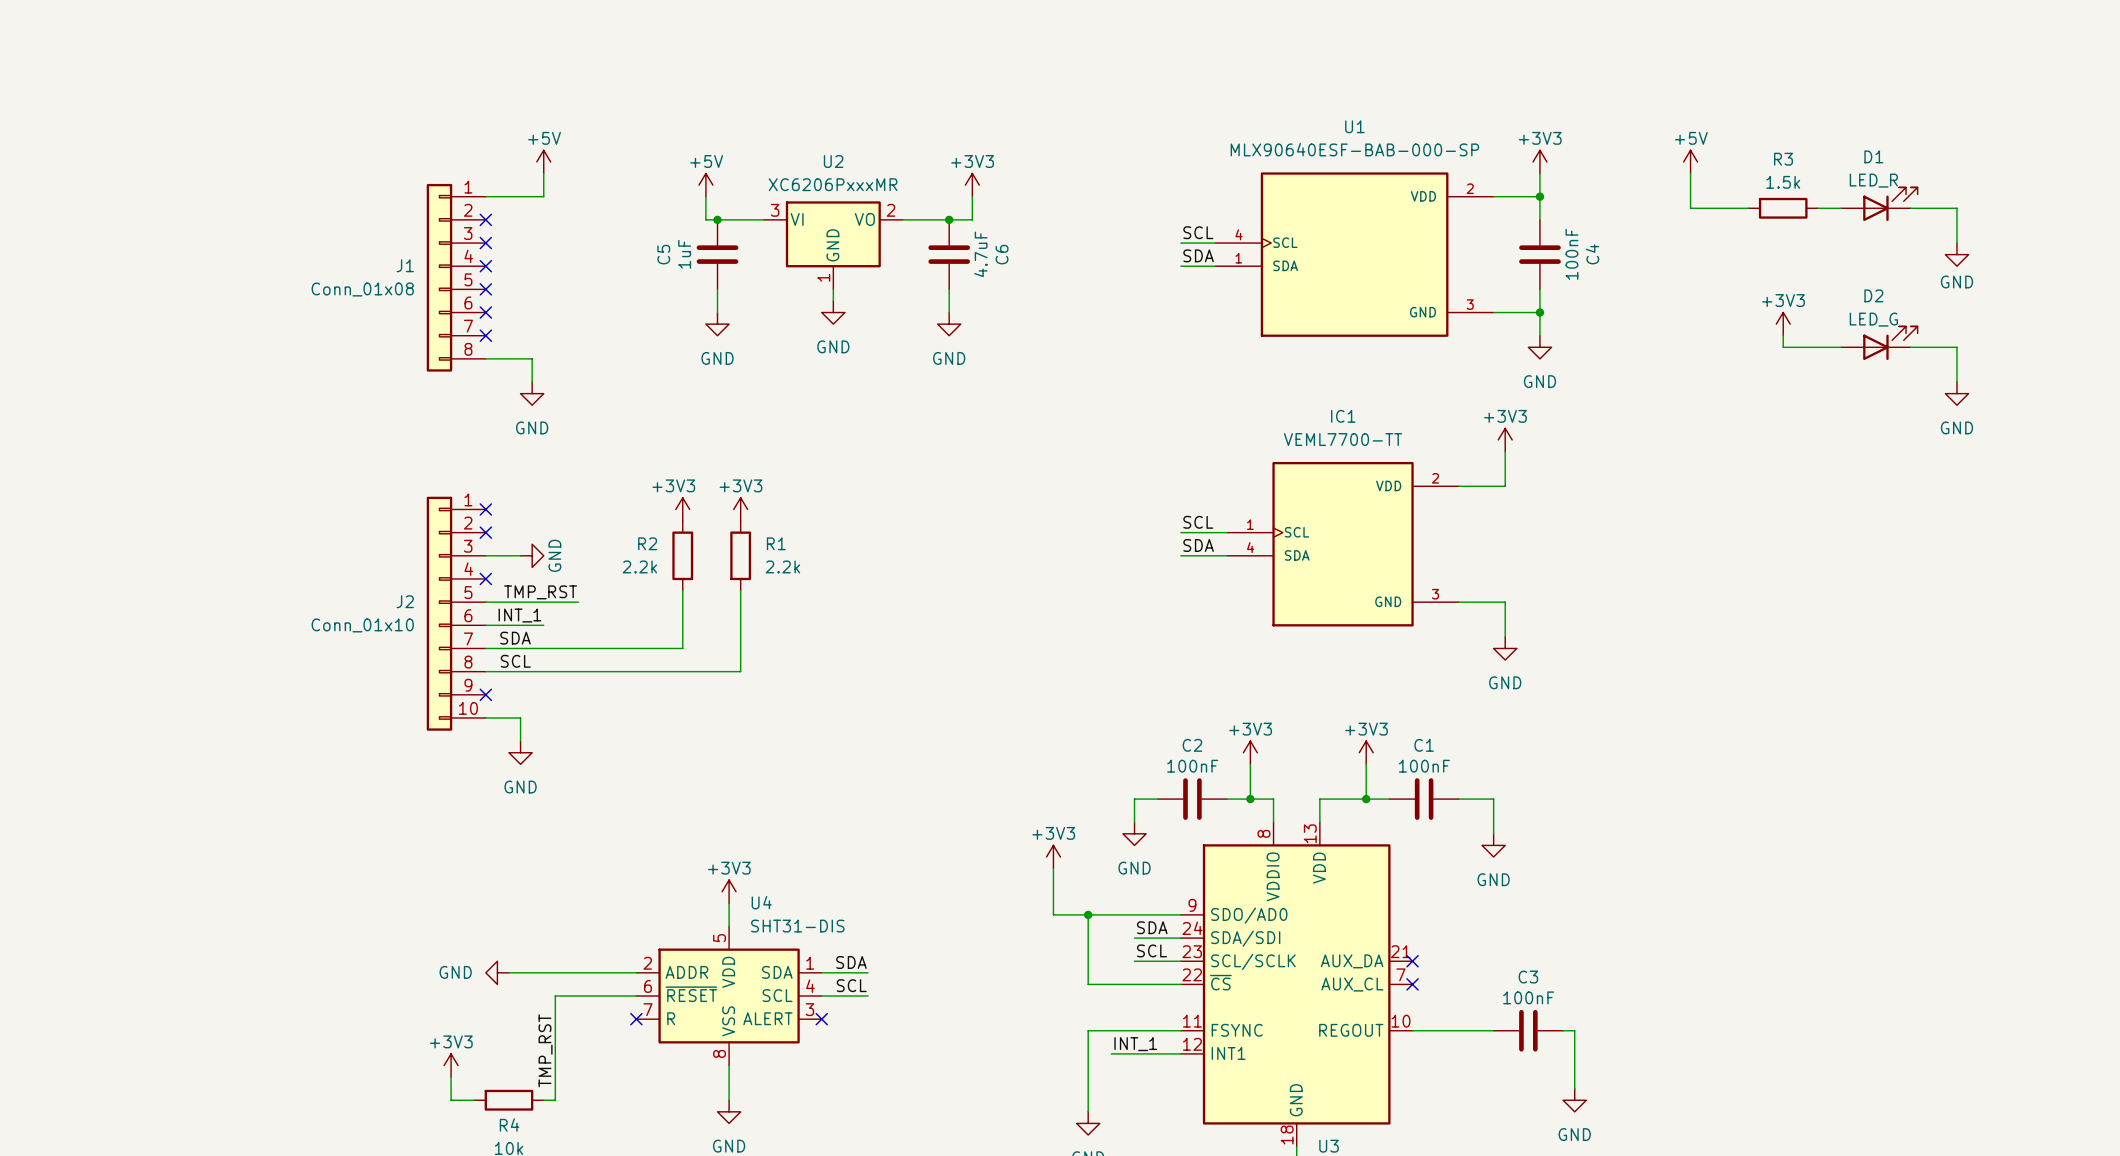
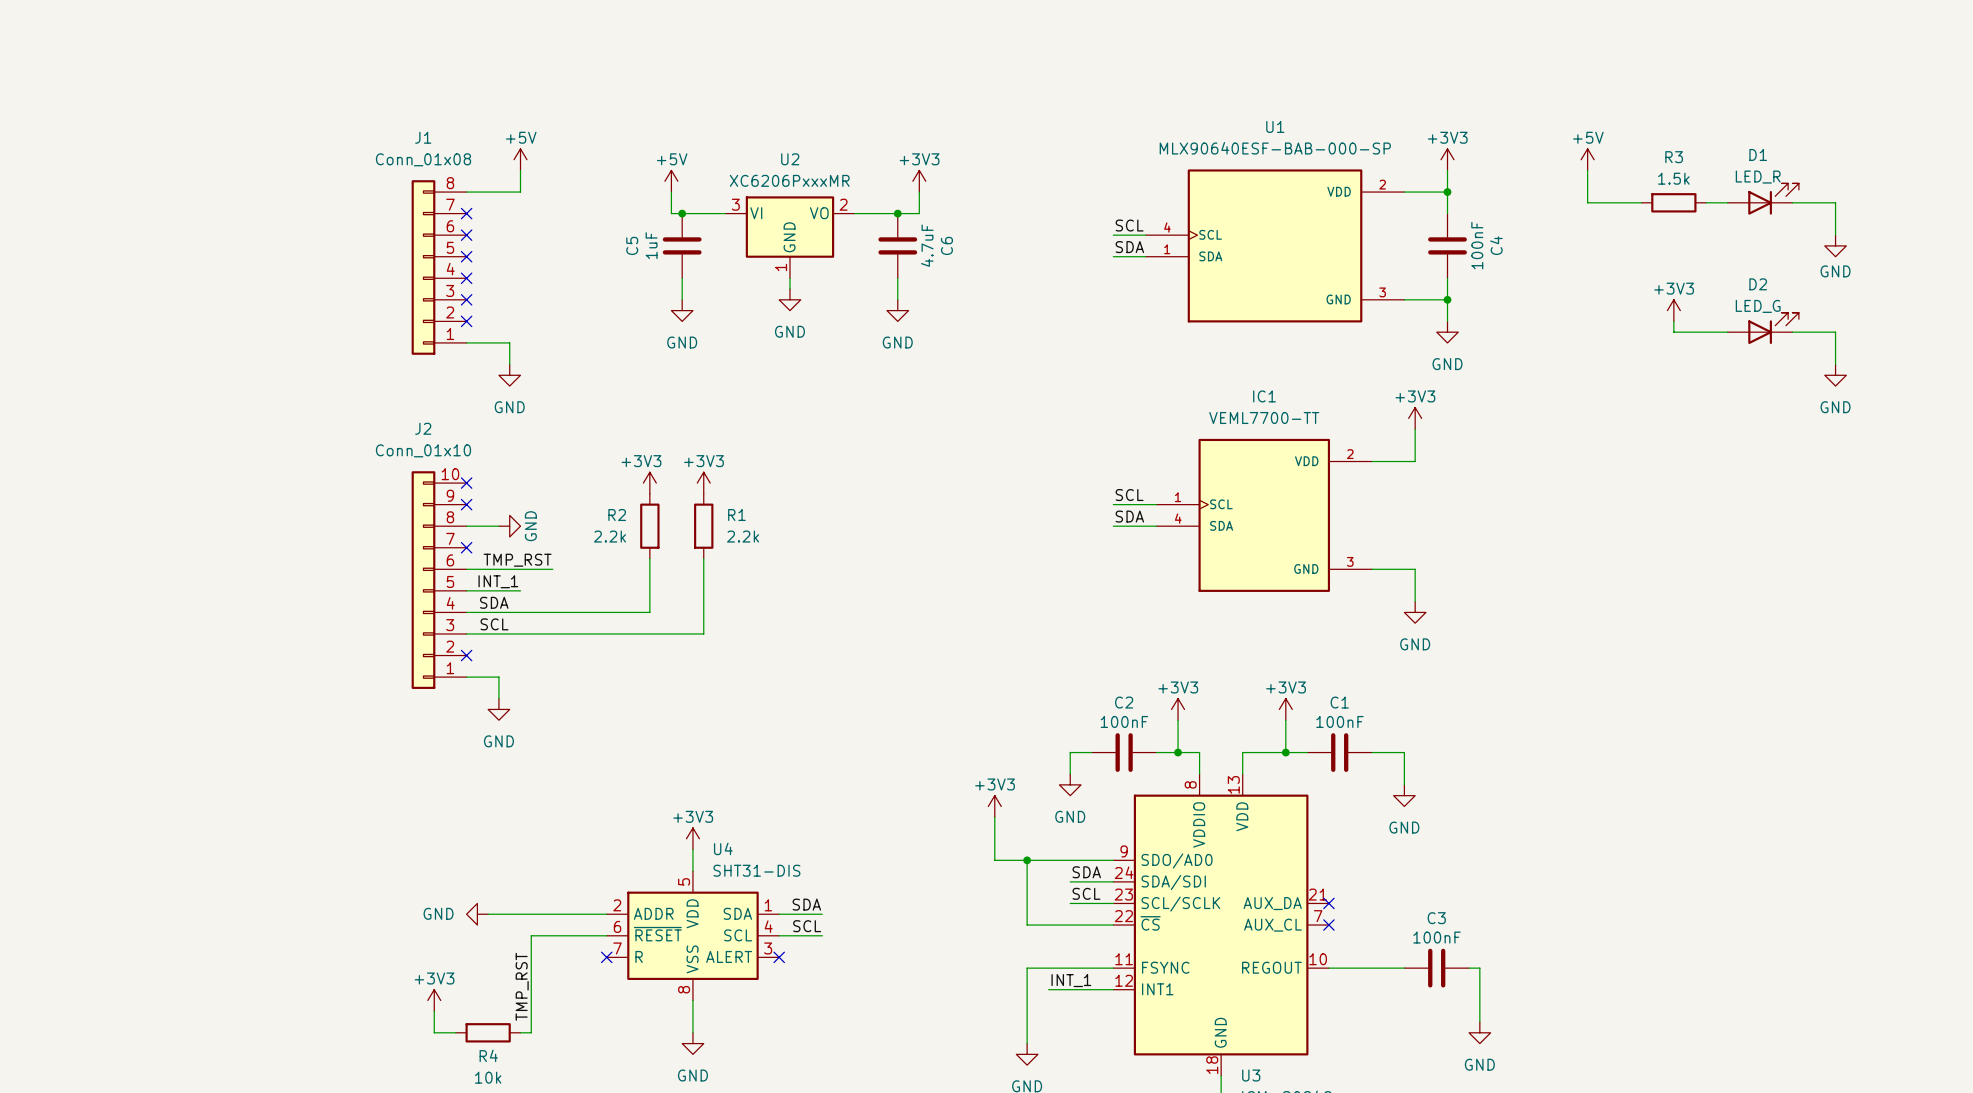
J1 name position: J1 (405, 265) -> J1 (423, 137)
J1 flip: as is (439, 277) -> up-down (423, 267)
J1 value position: Conn_01x08 (362, 289) -> Conn_01x08 (423, 159)
J2 name position: J2 (405, 601) -> J2 (423, 428)
J2 flip: as is (439, 613) -> up-down (423, 580)
J2 value position: Conn_01x10 (362, 625) -> Conn_01x10 (423, 450)

